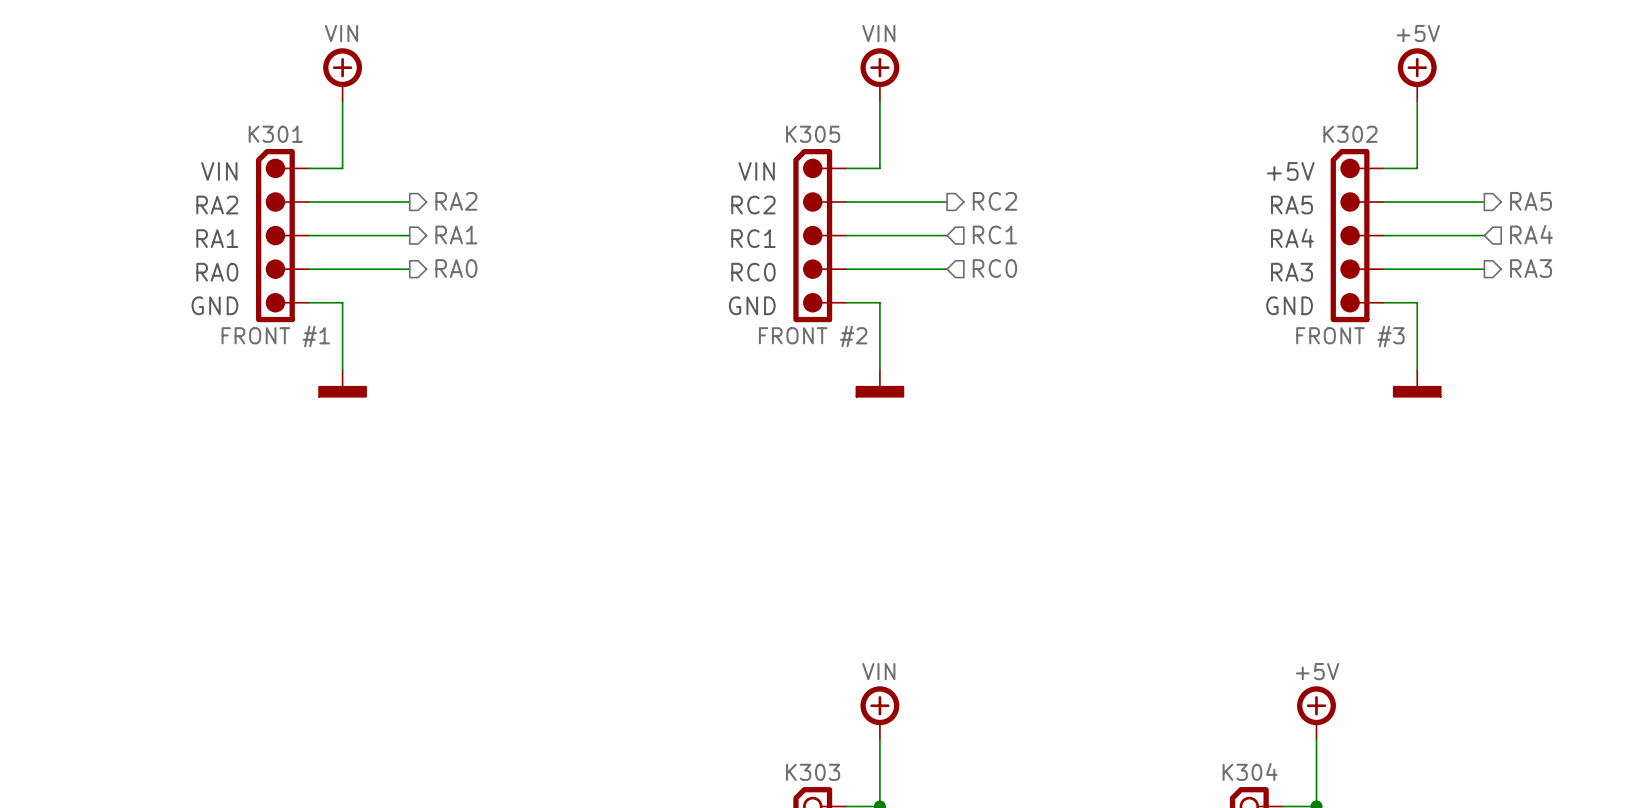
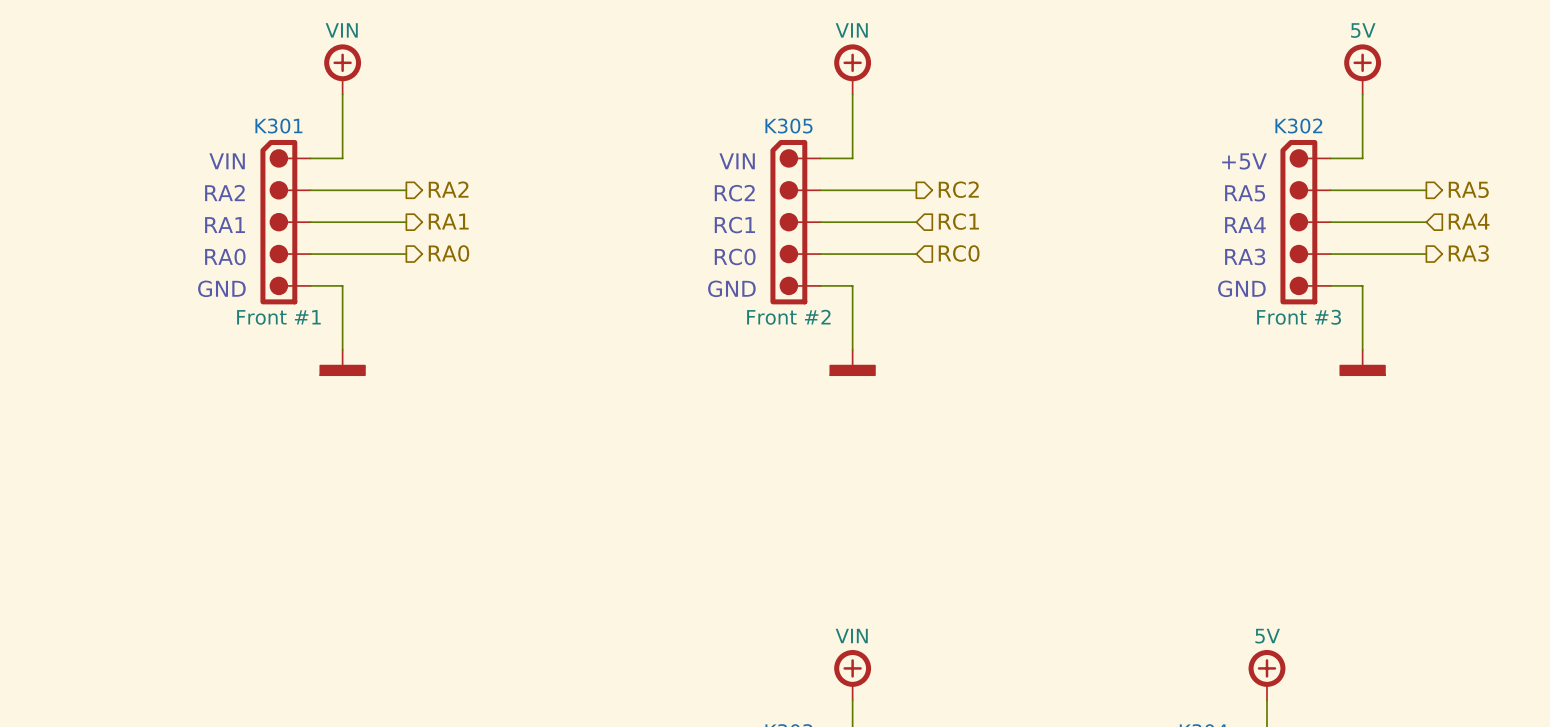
power symbol text: +5V (1418, 33) -> 5V (1363, 30)
K301 value: FRONT #1 (275, 336) -> Front #1 (278, 317)
K305 value: FRONT #2 (813, 336) -> Front #2 (788, 317)
K302 value: FRONT #3 (1350, 336) -> Front #3 (1299, 317)
power symbol text: +5V (1317, 671) -> 5V (1267, 636)

